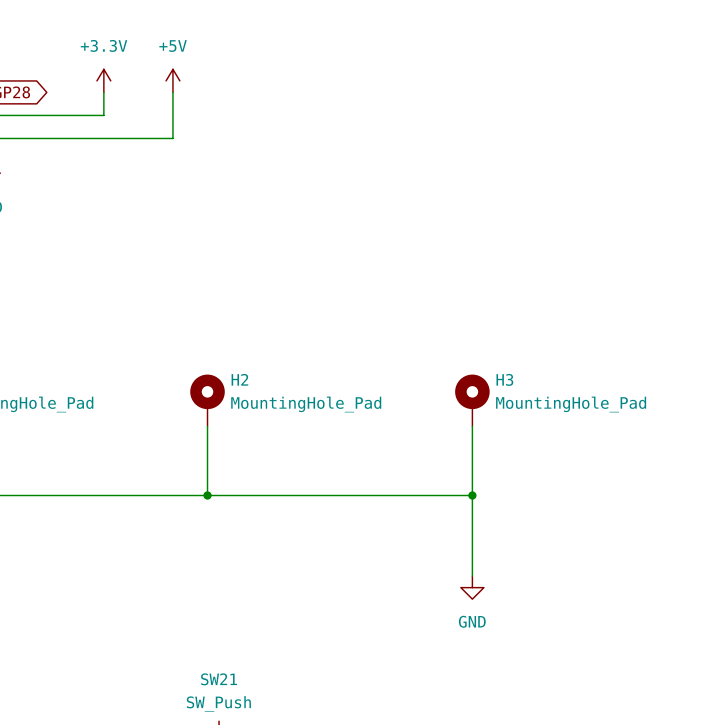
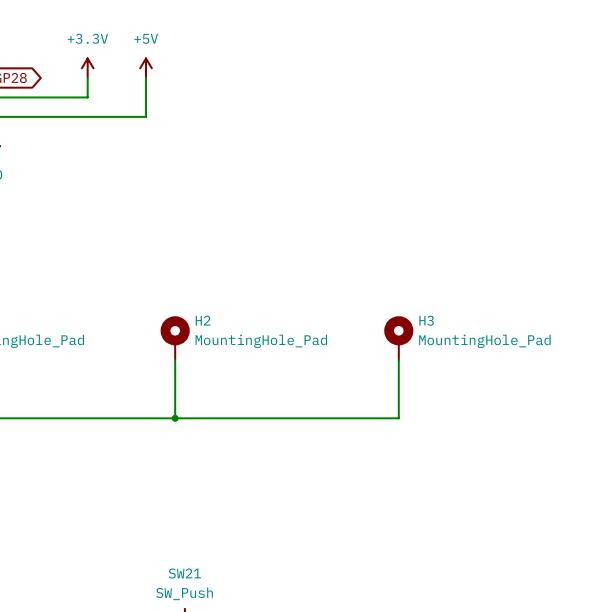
wire: (472, 495) (472, 576) -> none
junction: (472, 495) -> none
power symbol: GND (472, 587) -> none

